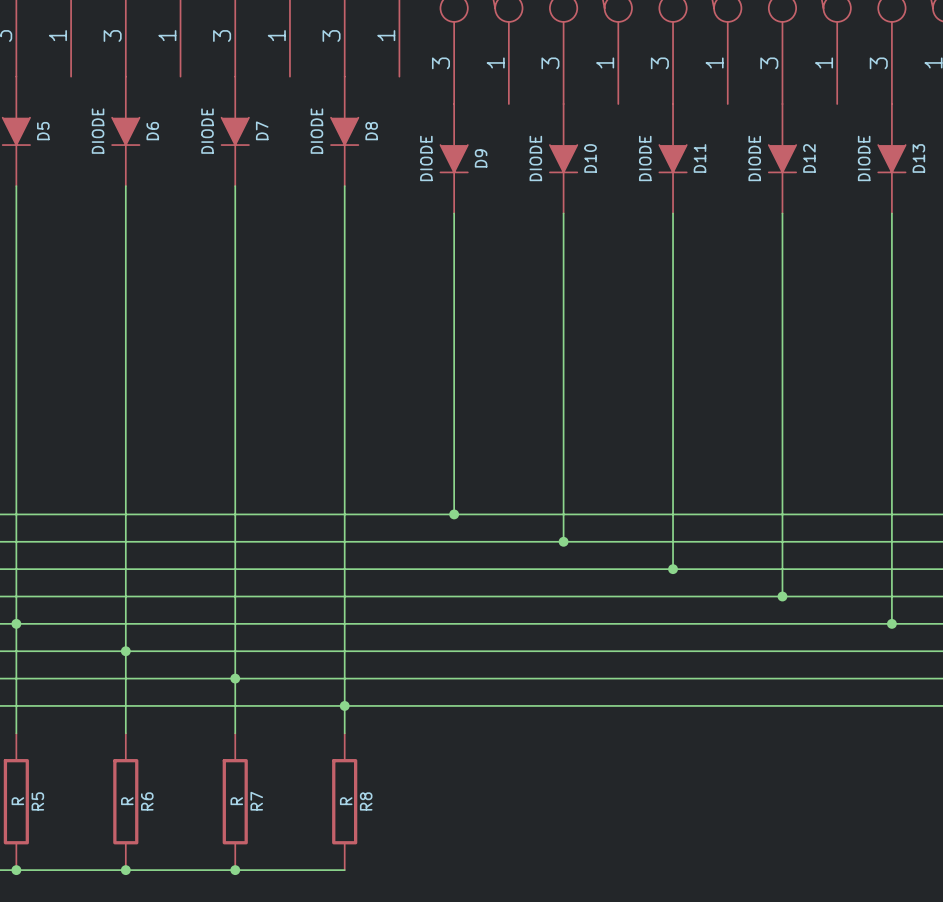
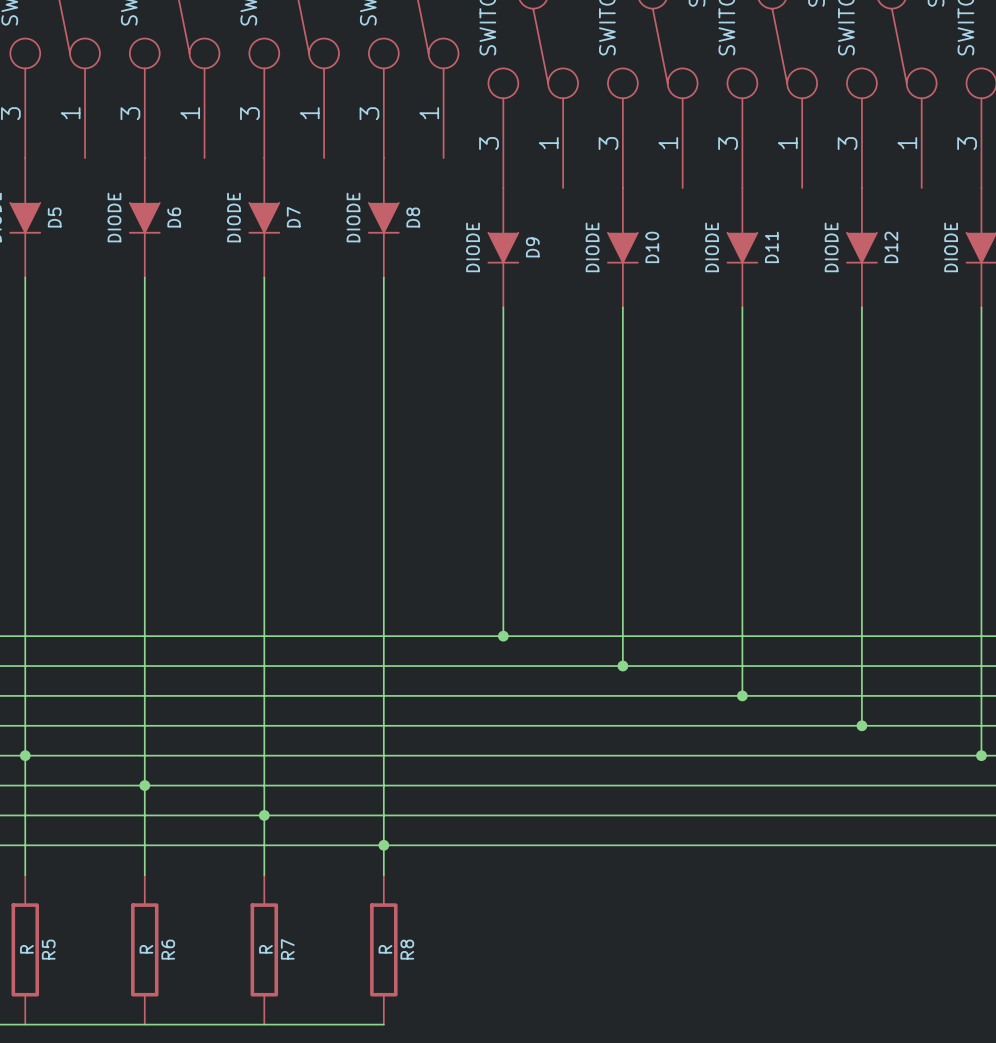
junction: (16, 870) -> none
junction: (125, 870) -> none
junction: (235, 870) -> none

